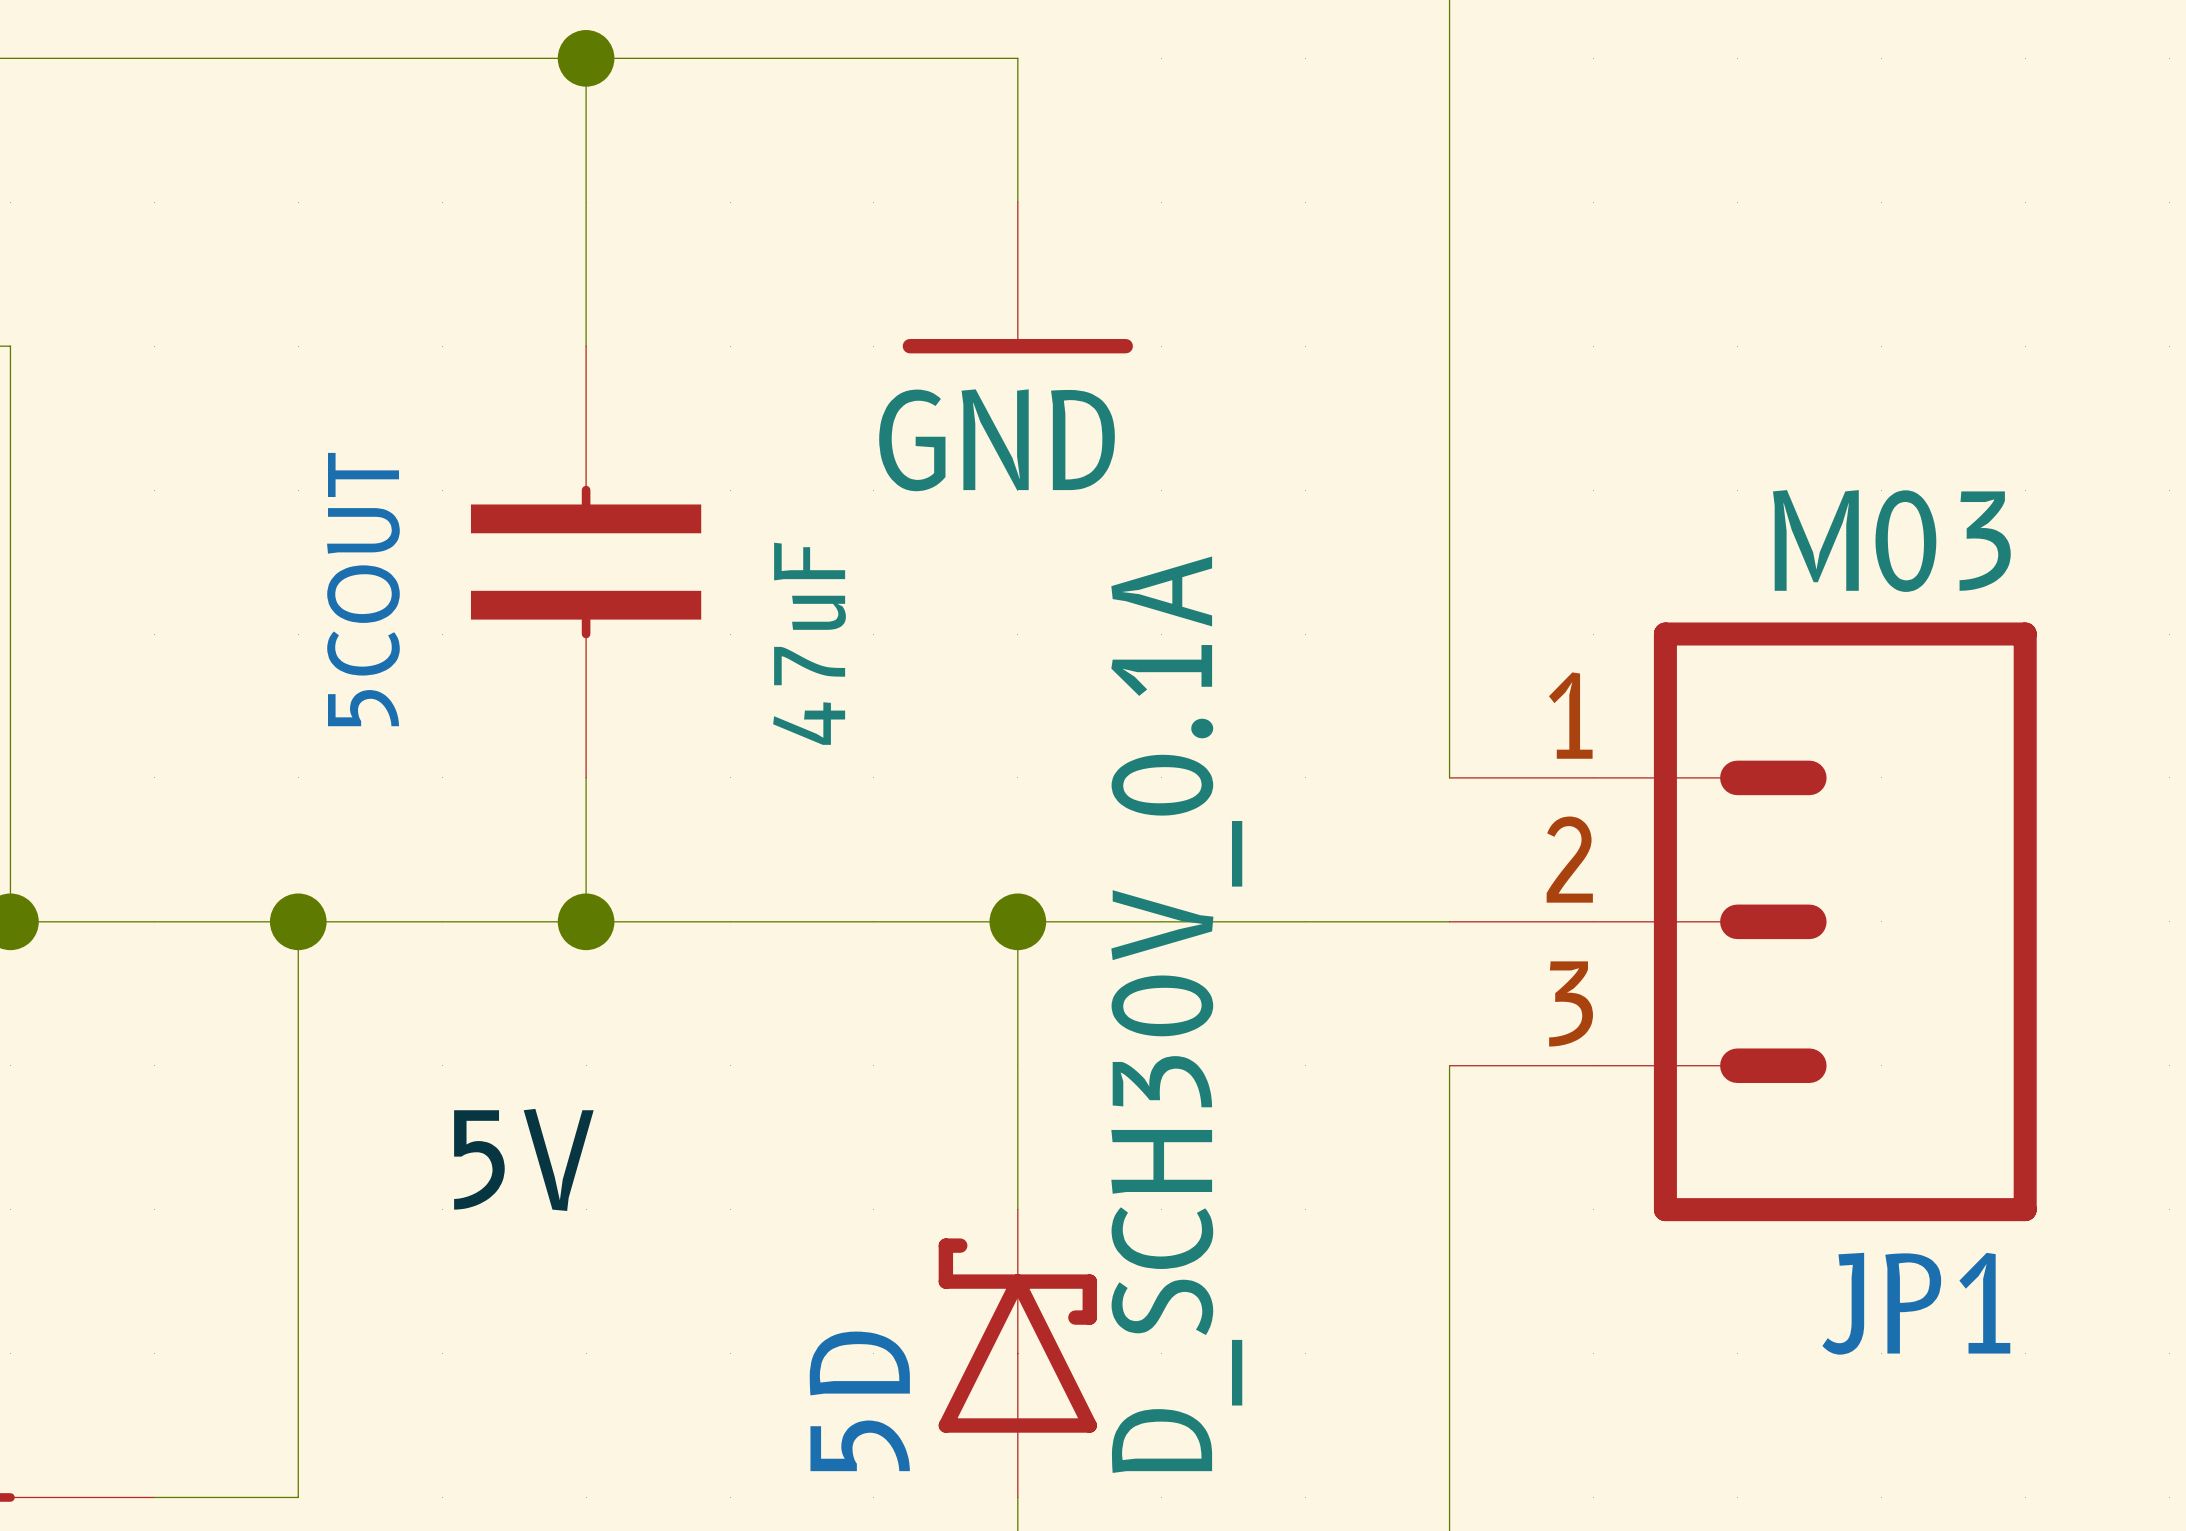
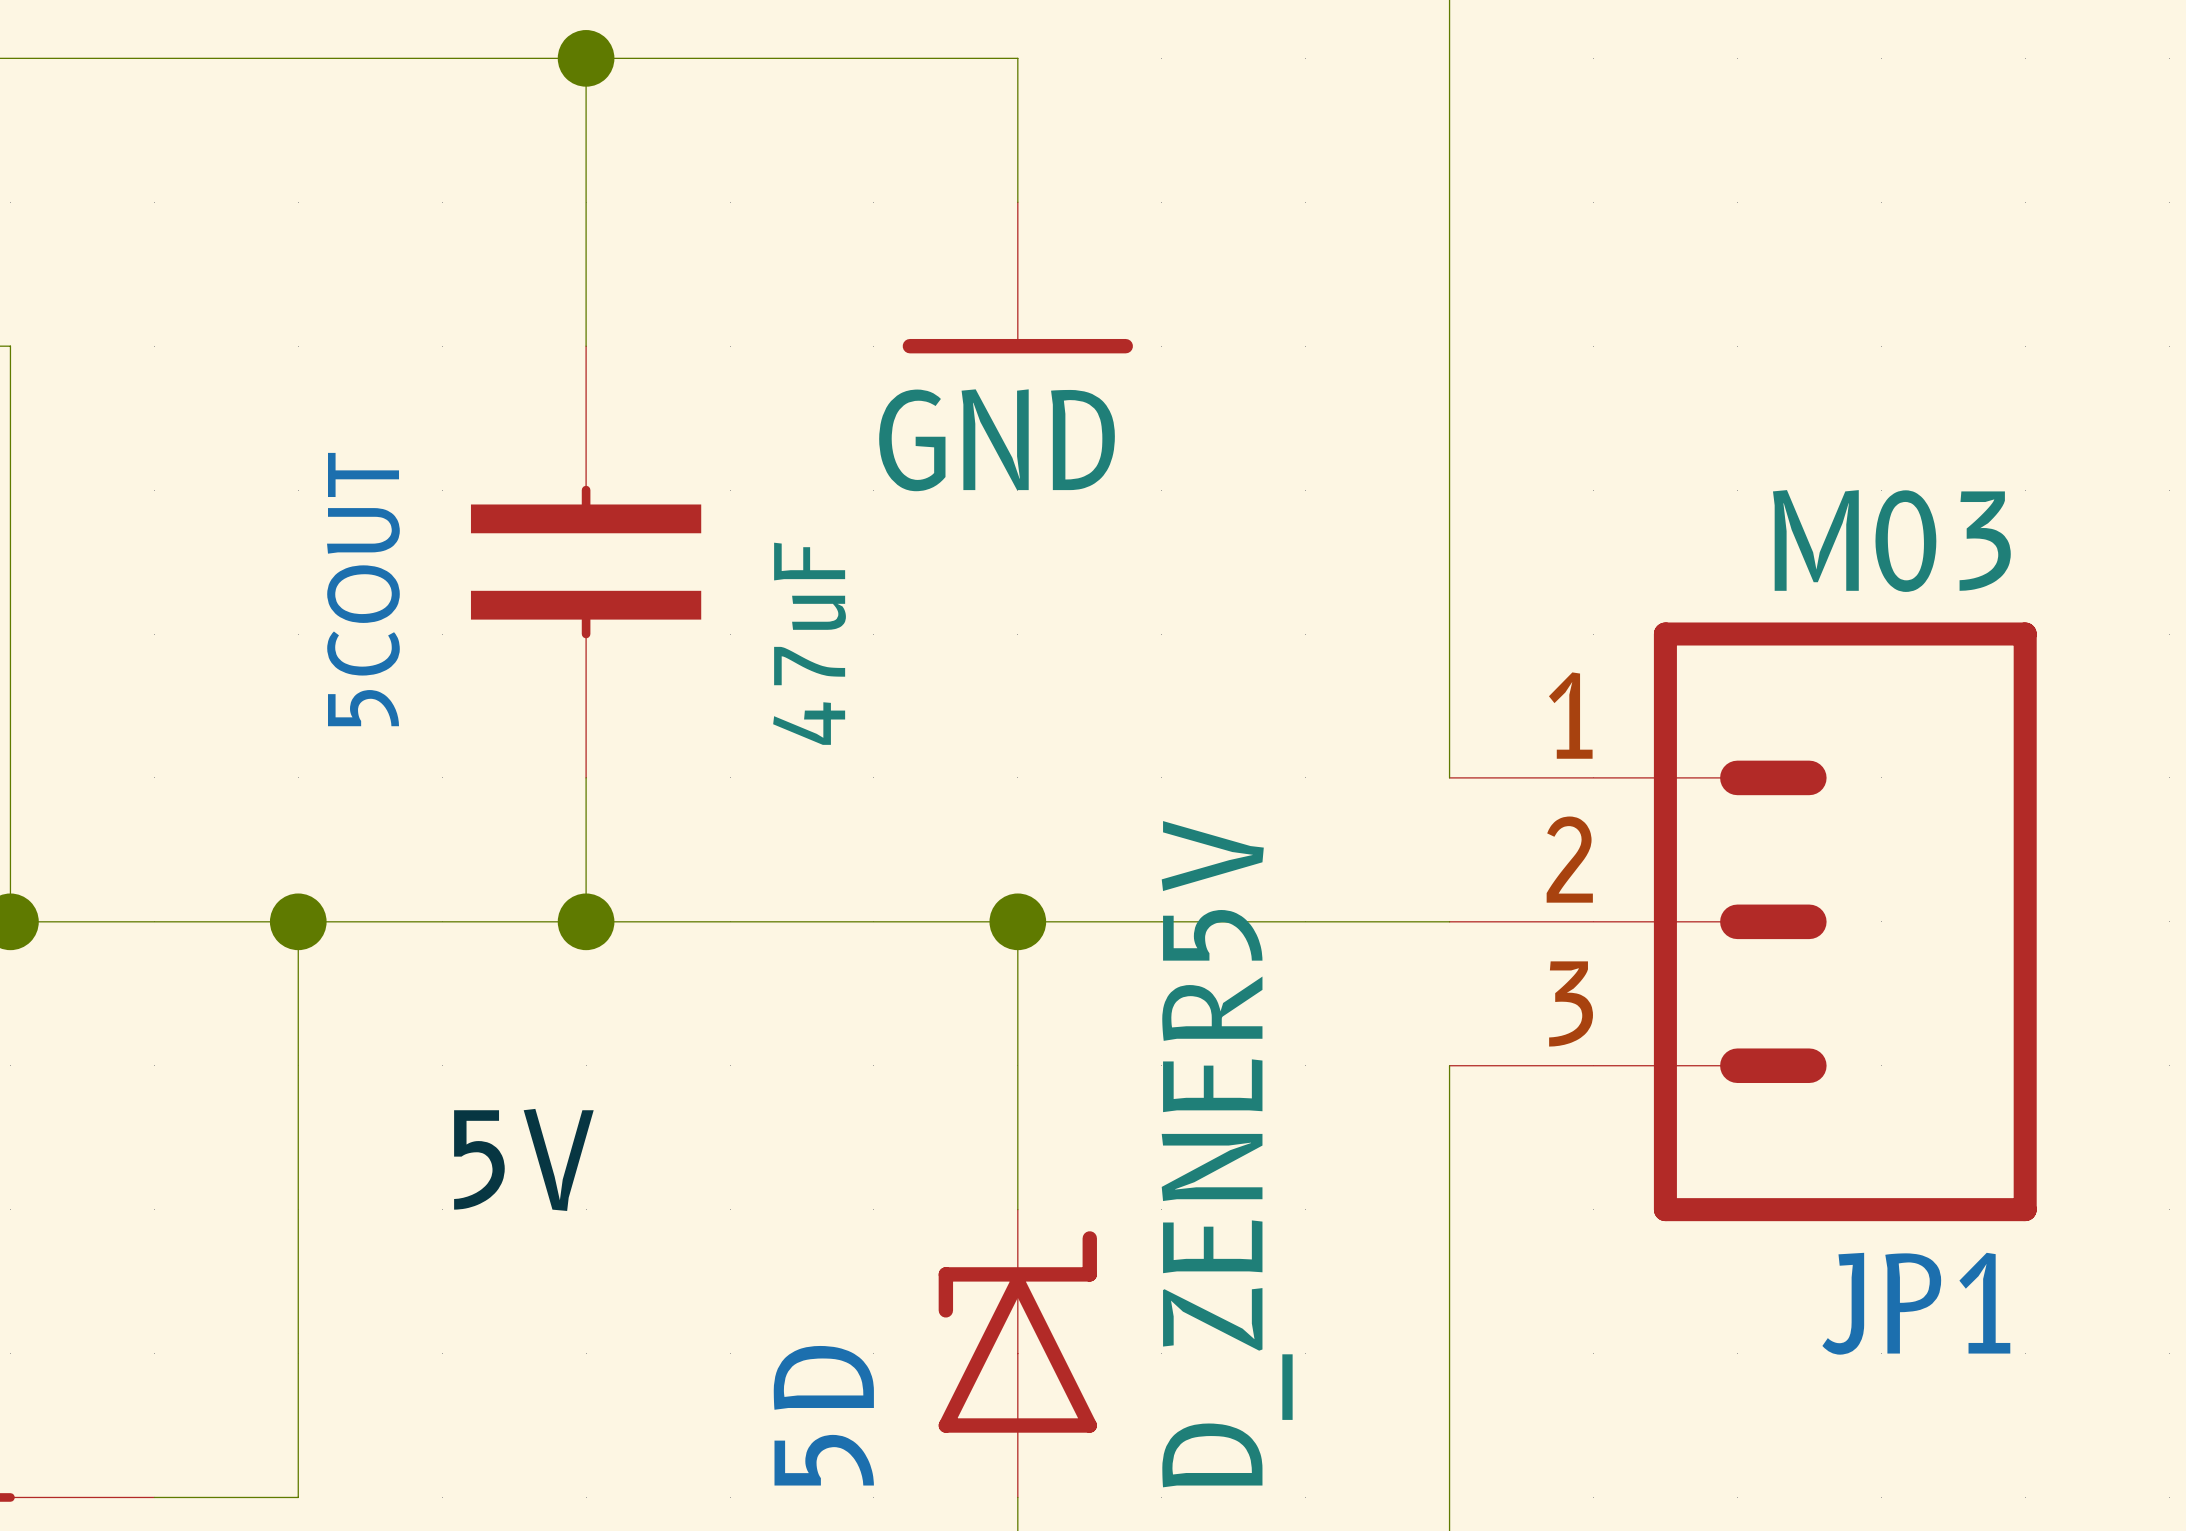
5D value: D_SCH30V_0.1A (1176, 1014) -> D_ZENER5V (1227, 1154)
5D symbol: [938, 1209, 1097, 1498] -> [938, 1209, 1097, 1498]
5D name position: 5D (859, 1401) -> 5D (823, 1415)

